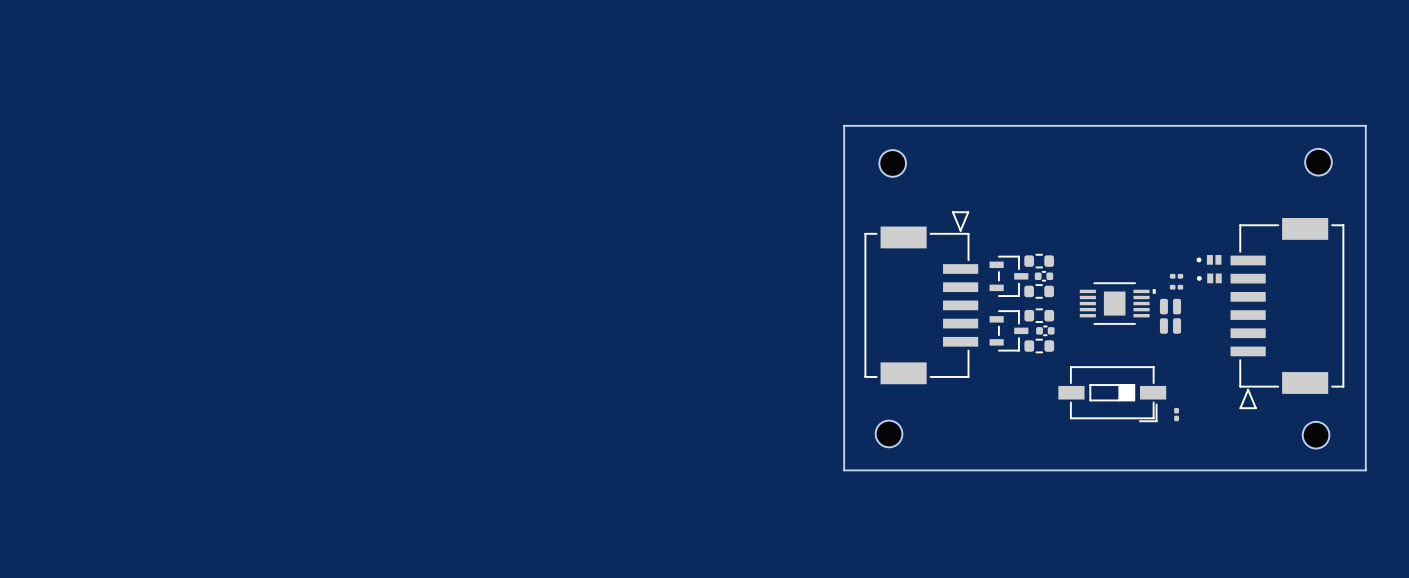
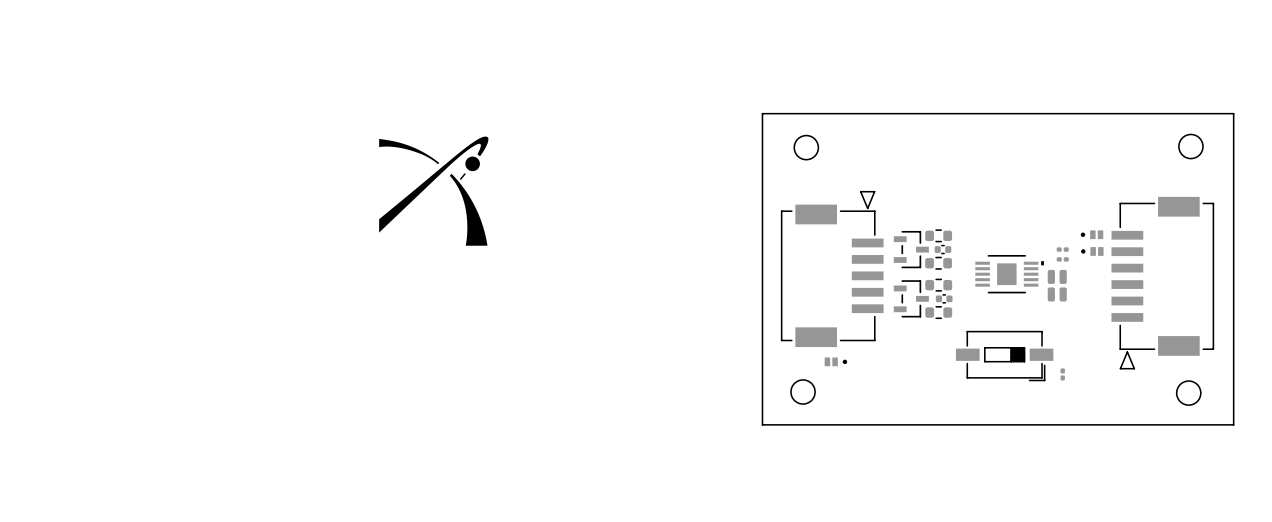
drawing: none -> [379, 136, 489, 246]
part: none -> (835, 361)

